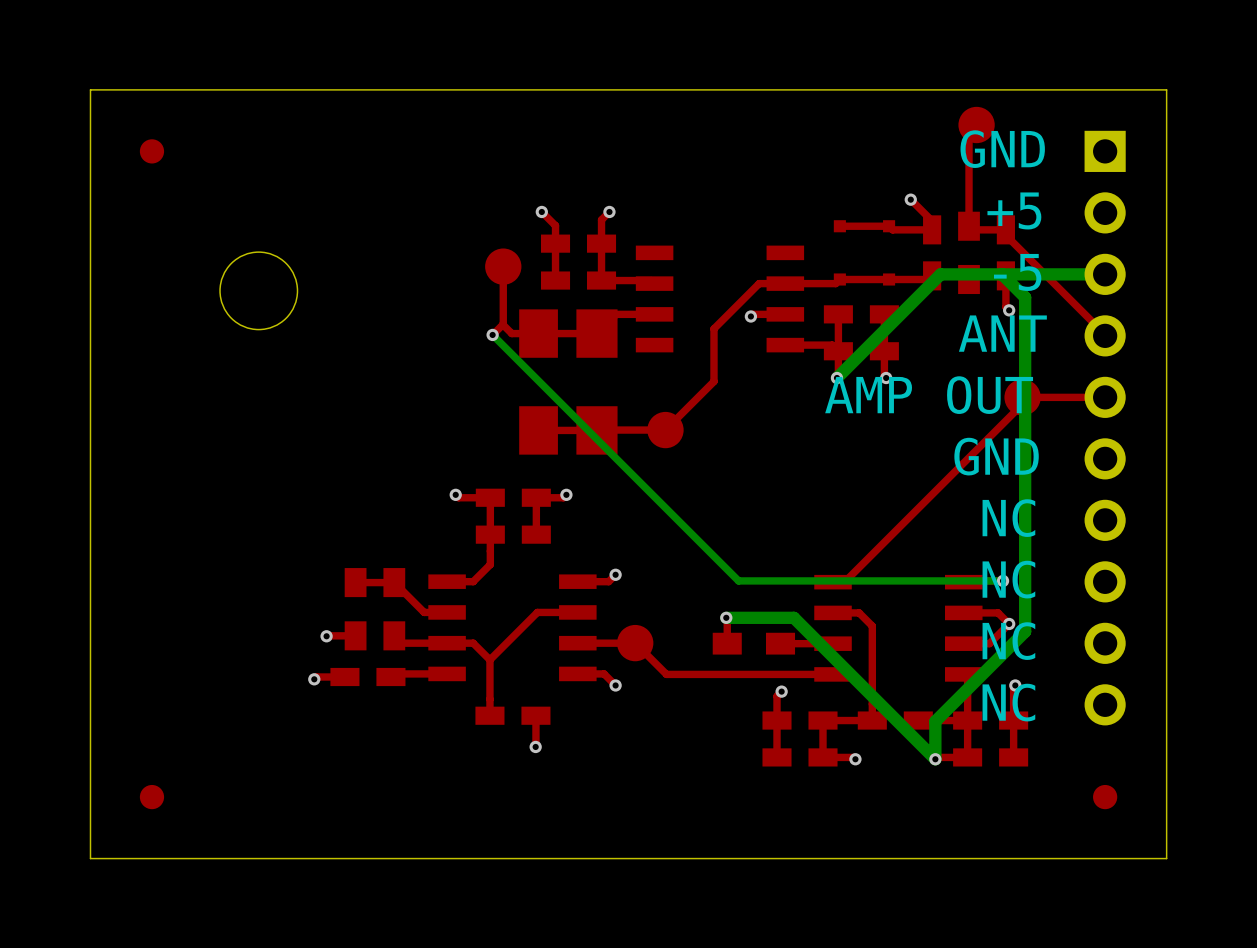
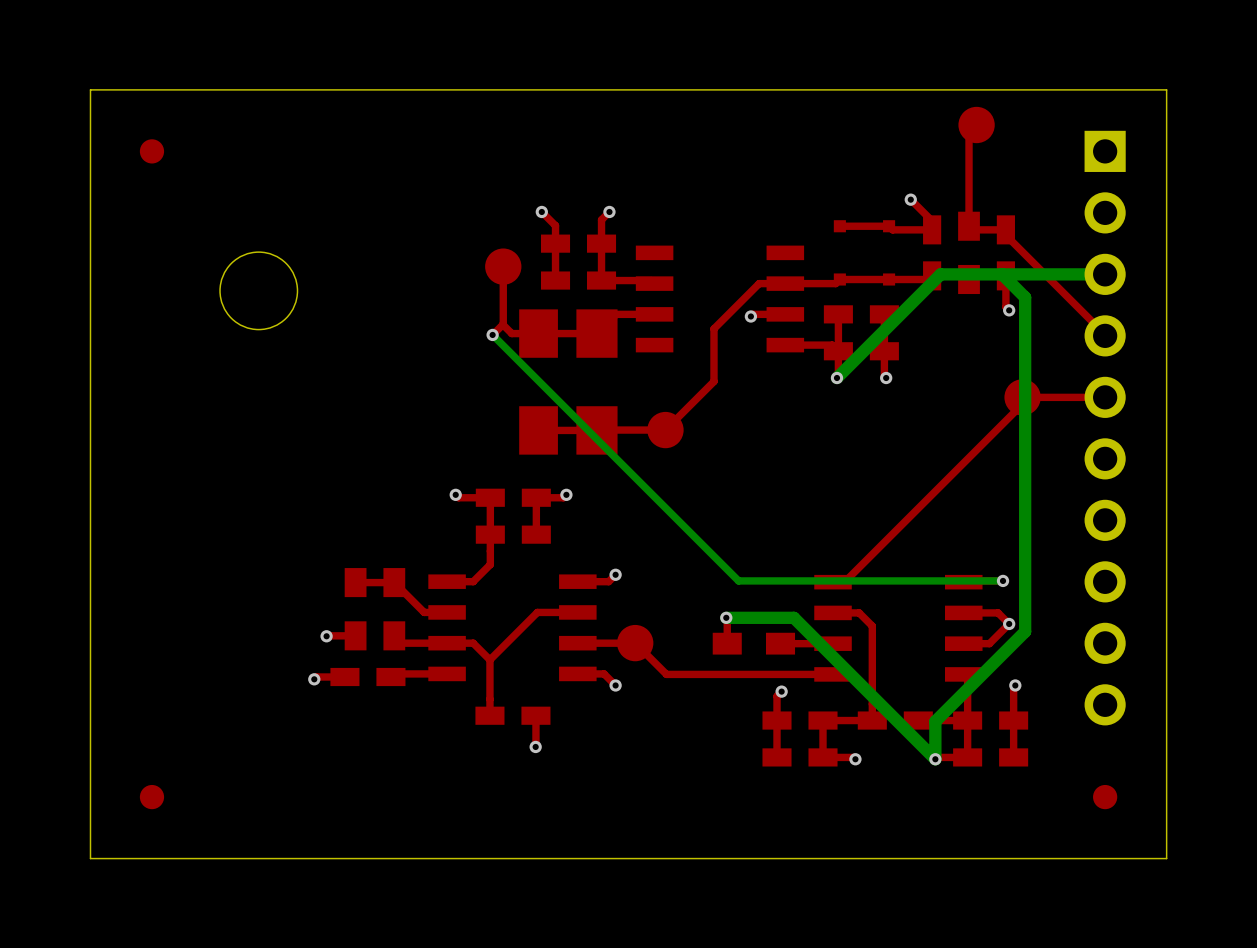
text: GND (1002, 149) -> none
text: +5 (1014, 210) -> none
text: -5 (1017, 272) -> none
text: ANT (1002, 333) -> none
text: AMP OUT (929, 395) -> none
text: GND (996, 456) -> none
text: NC (1008, 518) -> none
text: NC (1008, 579) -> none
text: NC (1008, 641) -> none
text: NC (1008, 702) -> none

